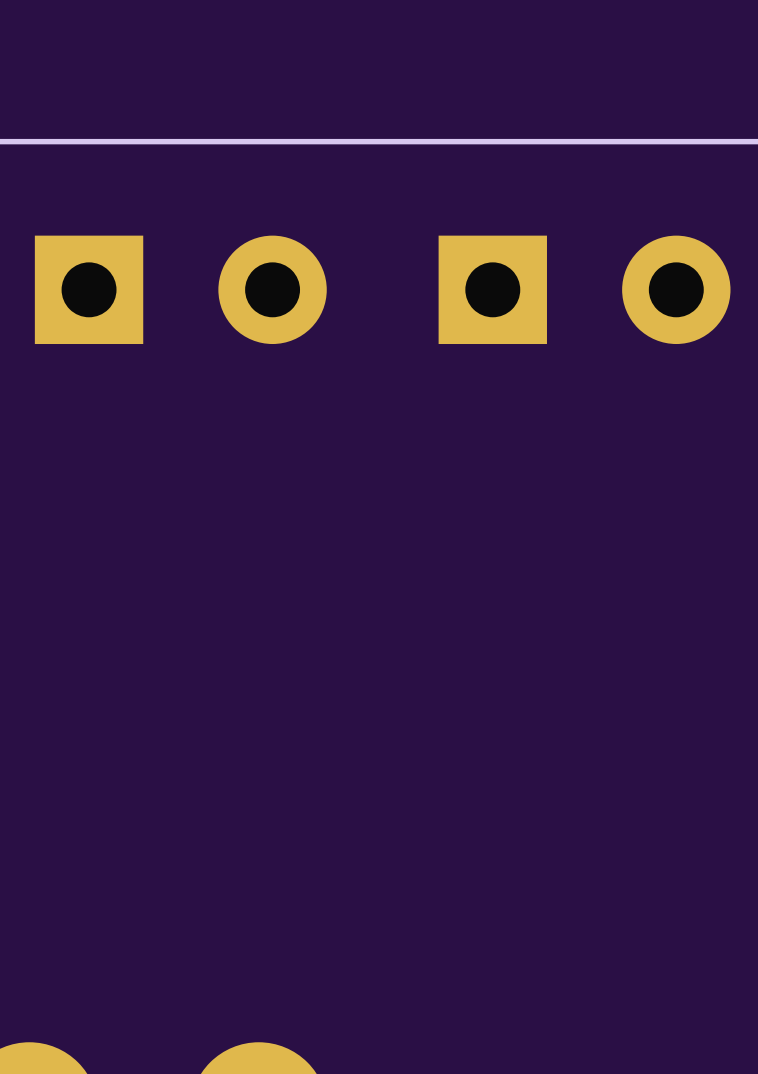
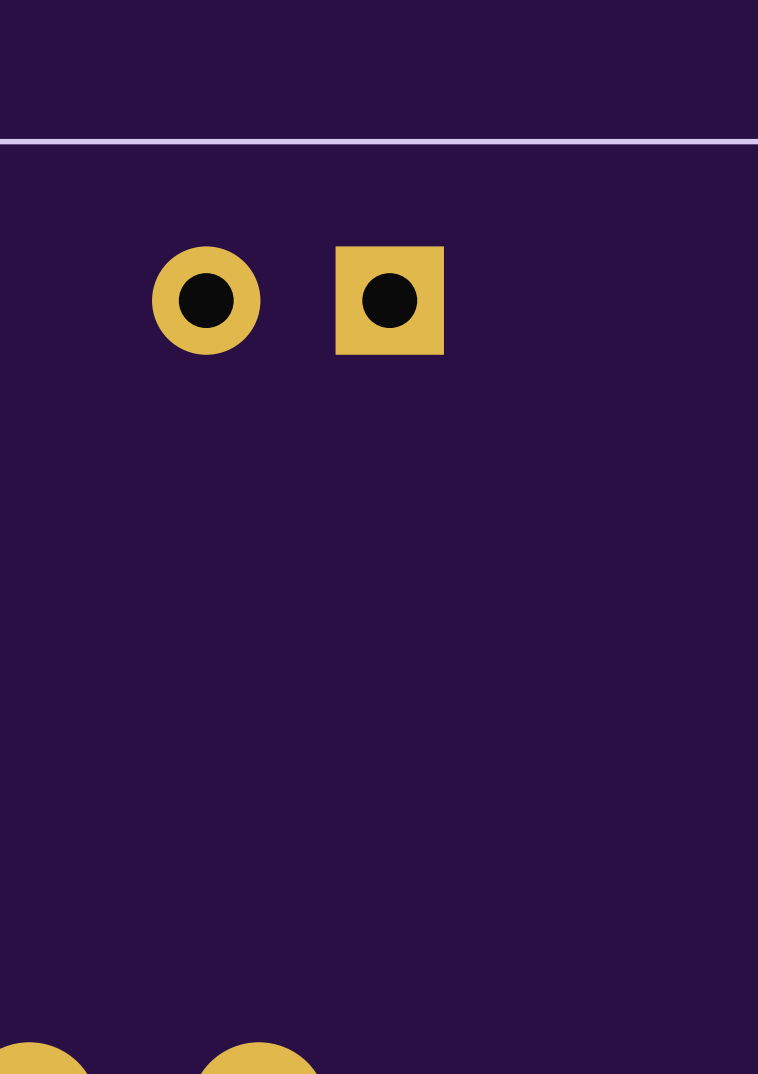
part rotation: 0° (180, 289) -> 180° (298, 300)
part: (584, 289) -> none

